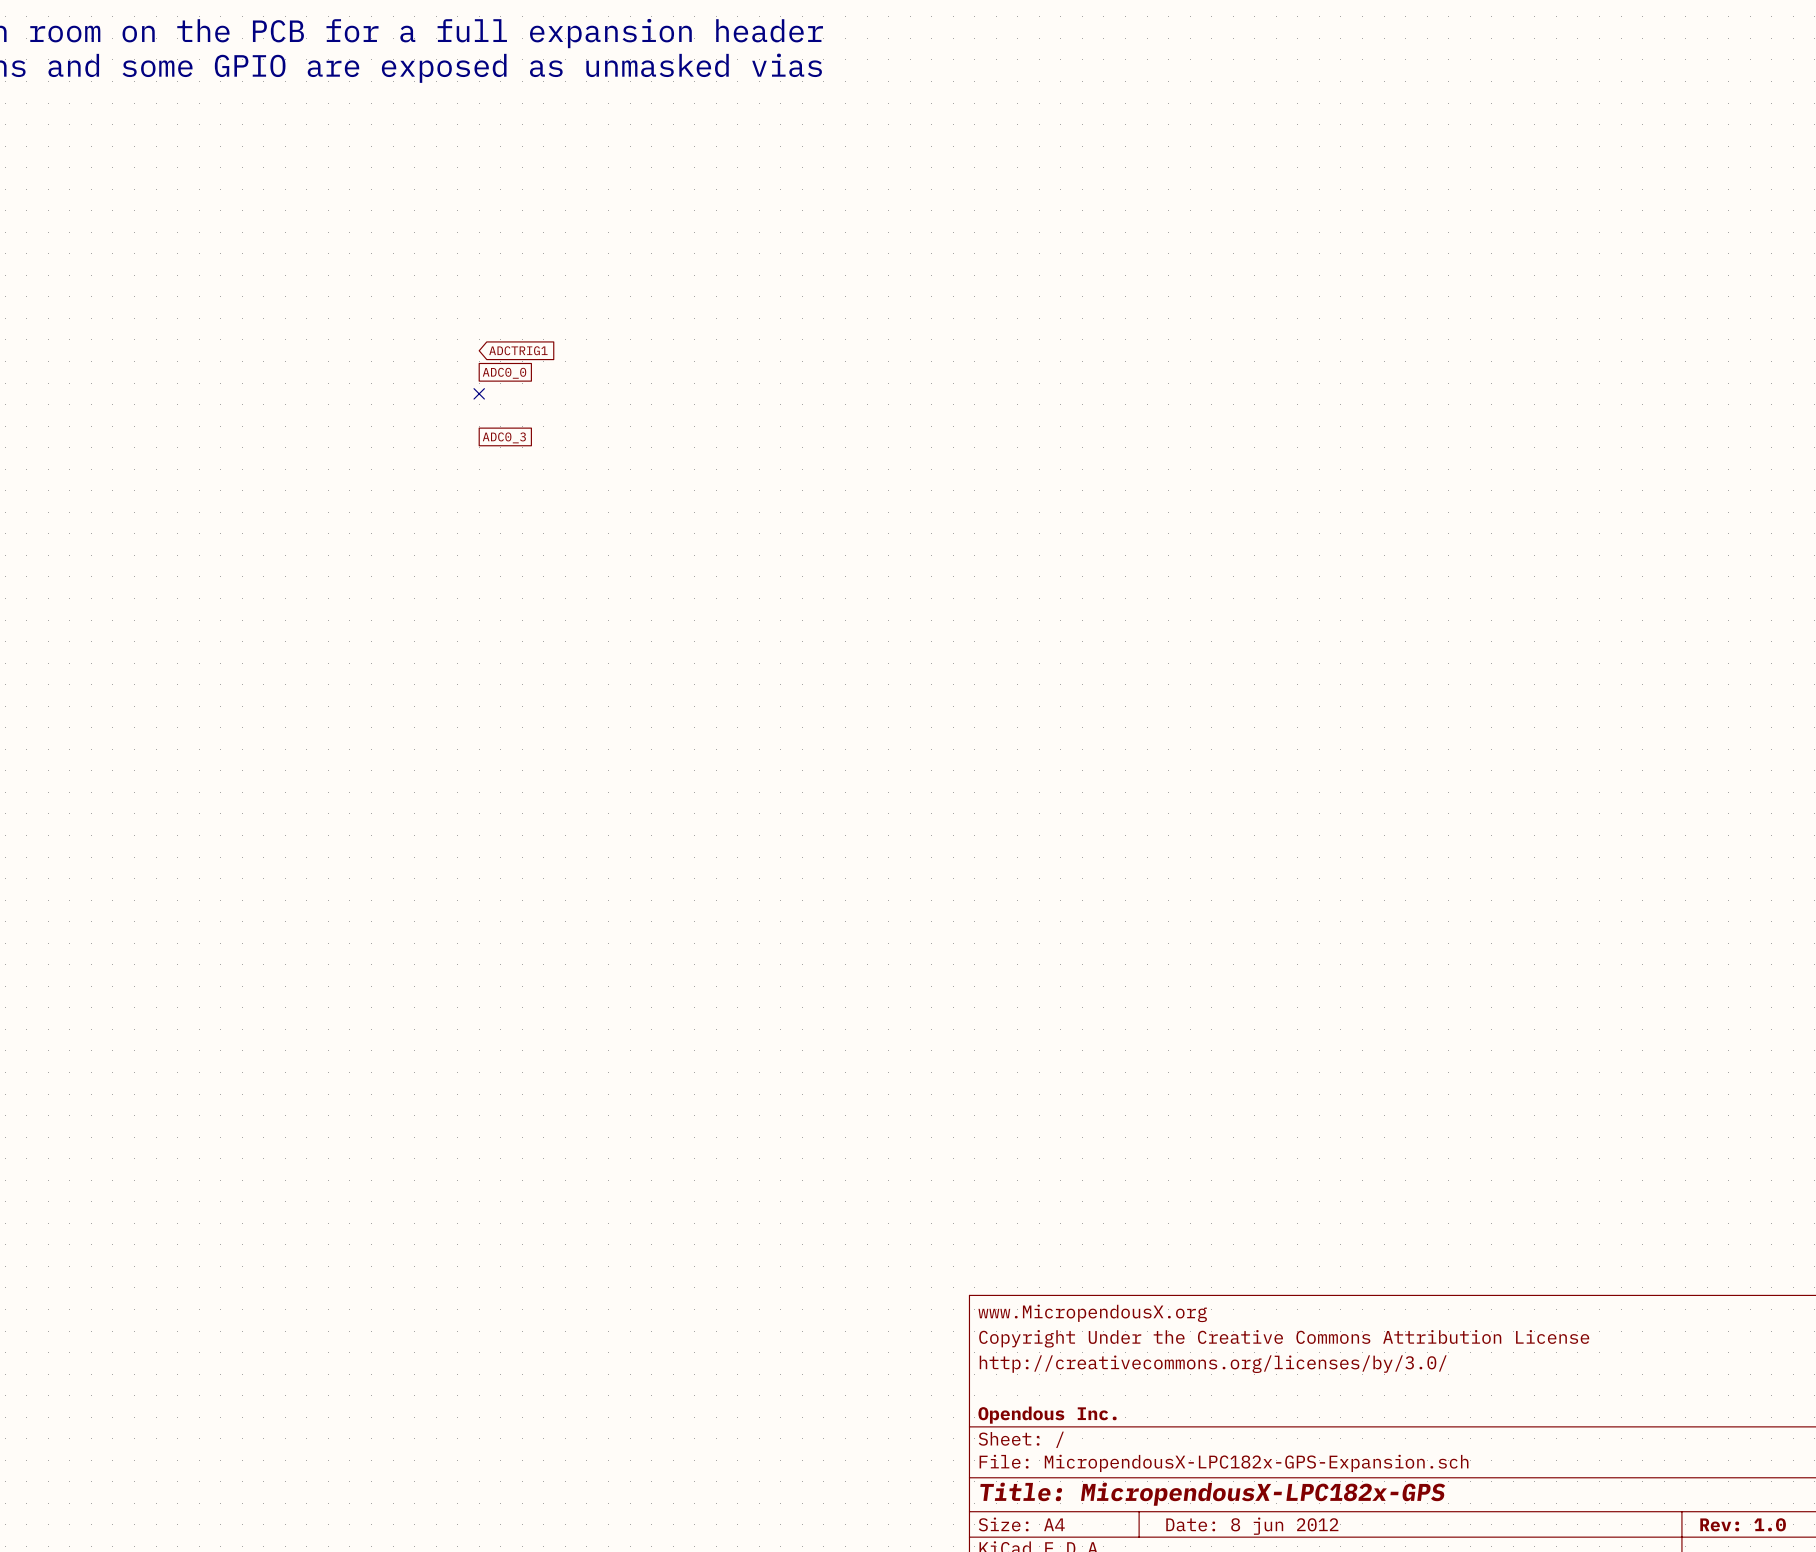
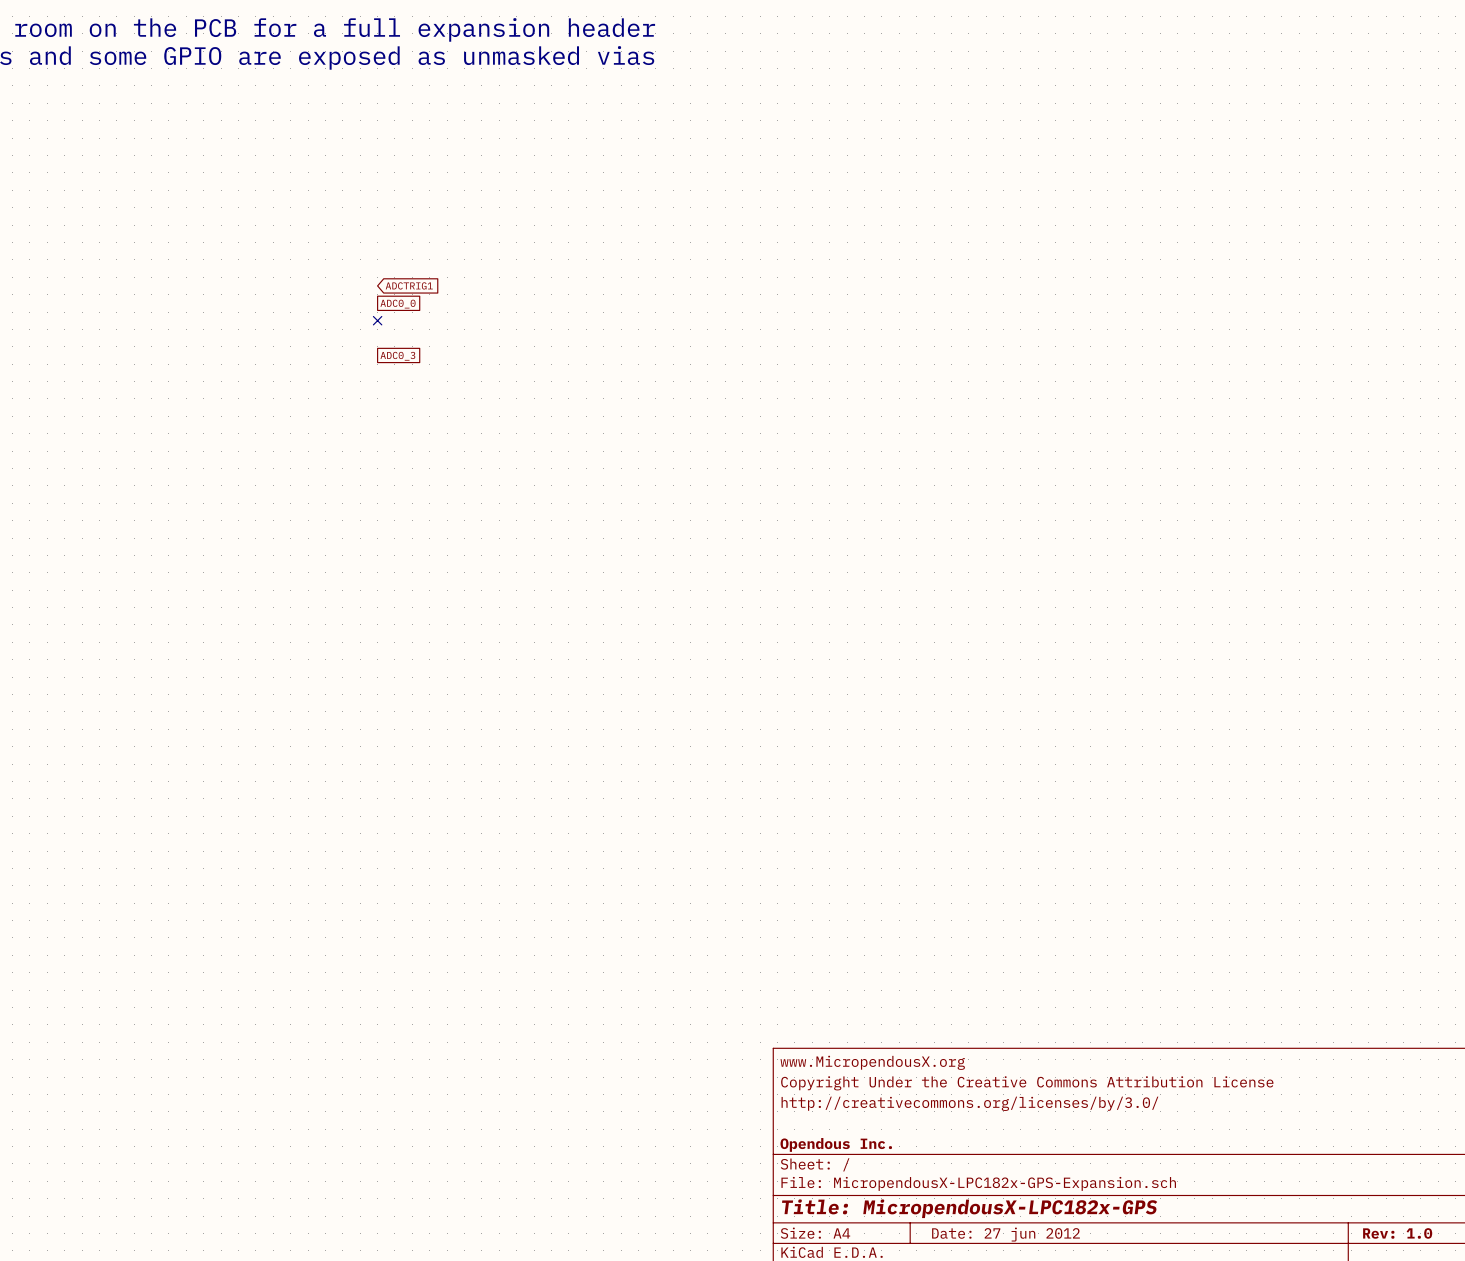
title block: Date: 8 jun 2012 (1252, 1526) -> Date: 27 jun 2012 (1005, 1234)

